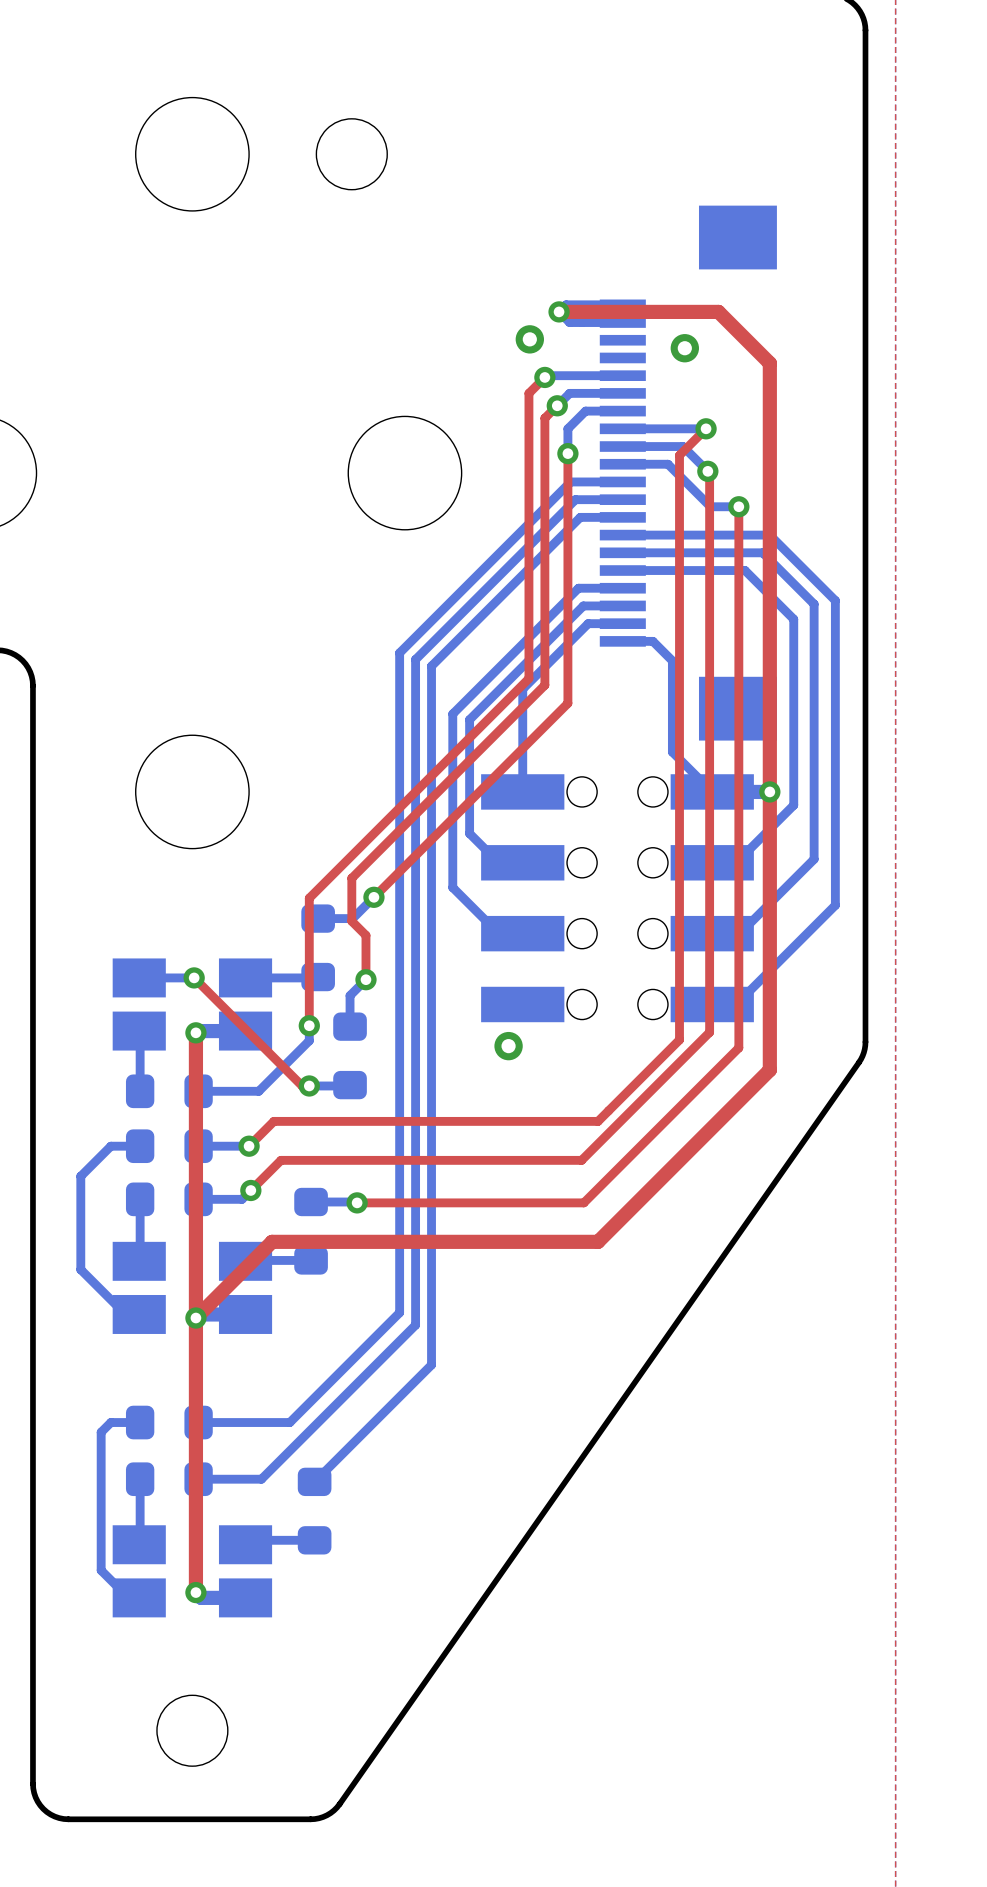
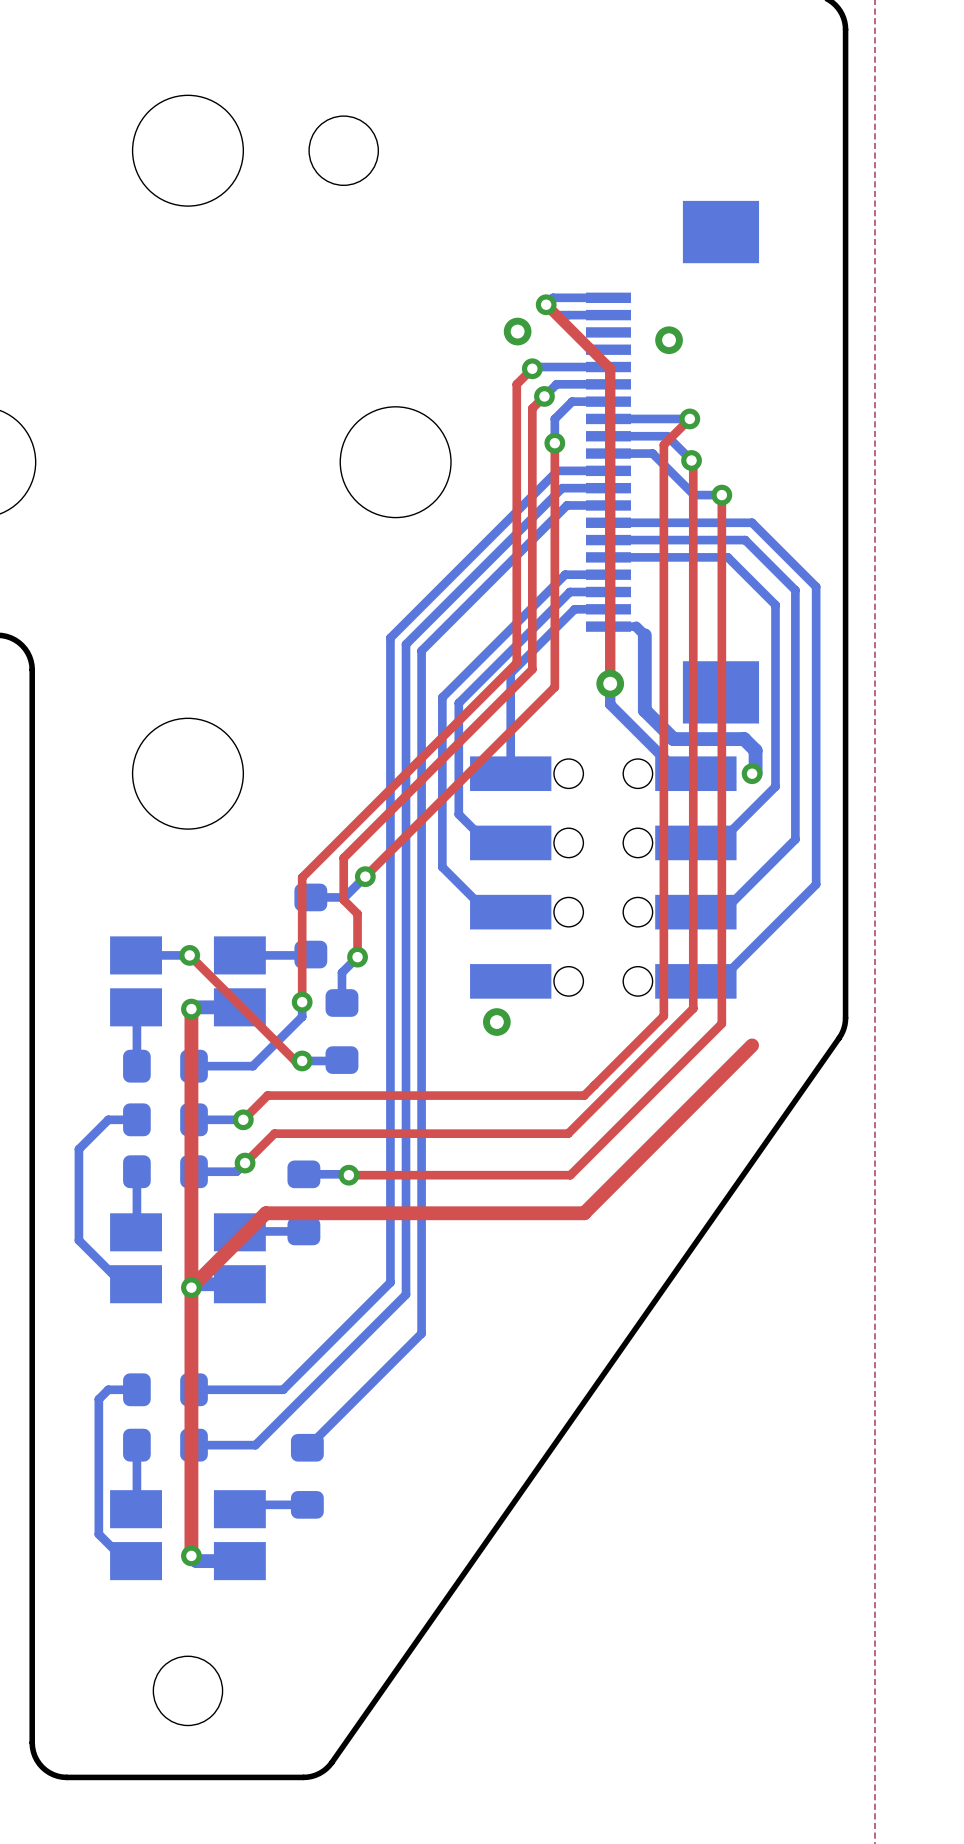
top track: (559, 311) (718, 311) (769, 363) (769, 1070) -> (546, 304) (610, 368) (610, 683)
bottom track: (651, 641) (672, 660) (672, 752) (712, 791) (769, 791) -> (636, 626) (644, 635) (644, 710) (673, 739) (744, 739) (755, 750) (755, 773)
bottom track: none -> (610, 683) (610, 704) (679, 773) (695, 773)
via: none -> (610, 683)

